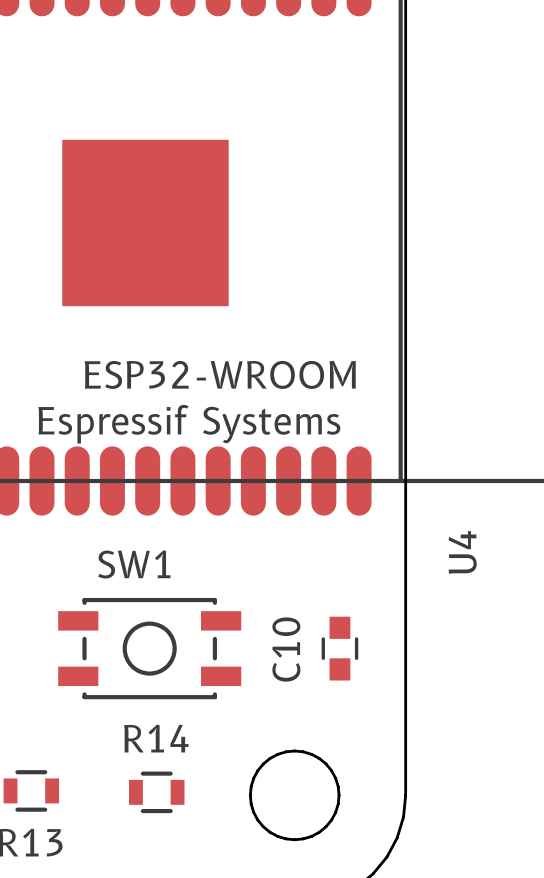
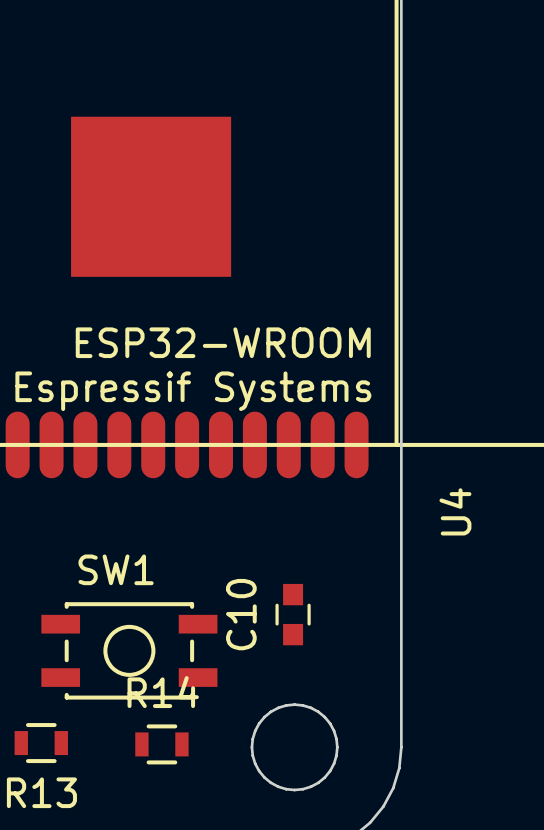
SW1 position: (149, 648) -> (129, 650)
C10 position: (339, 648) -> (293, 614)

